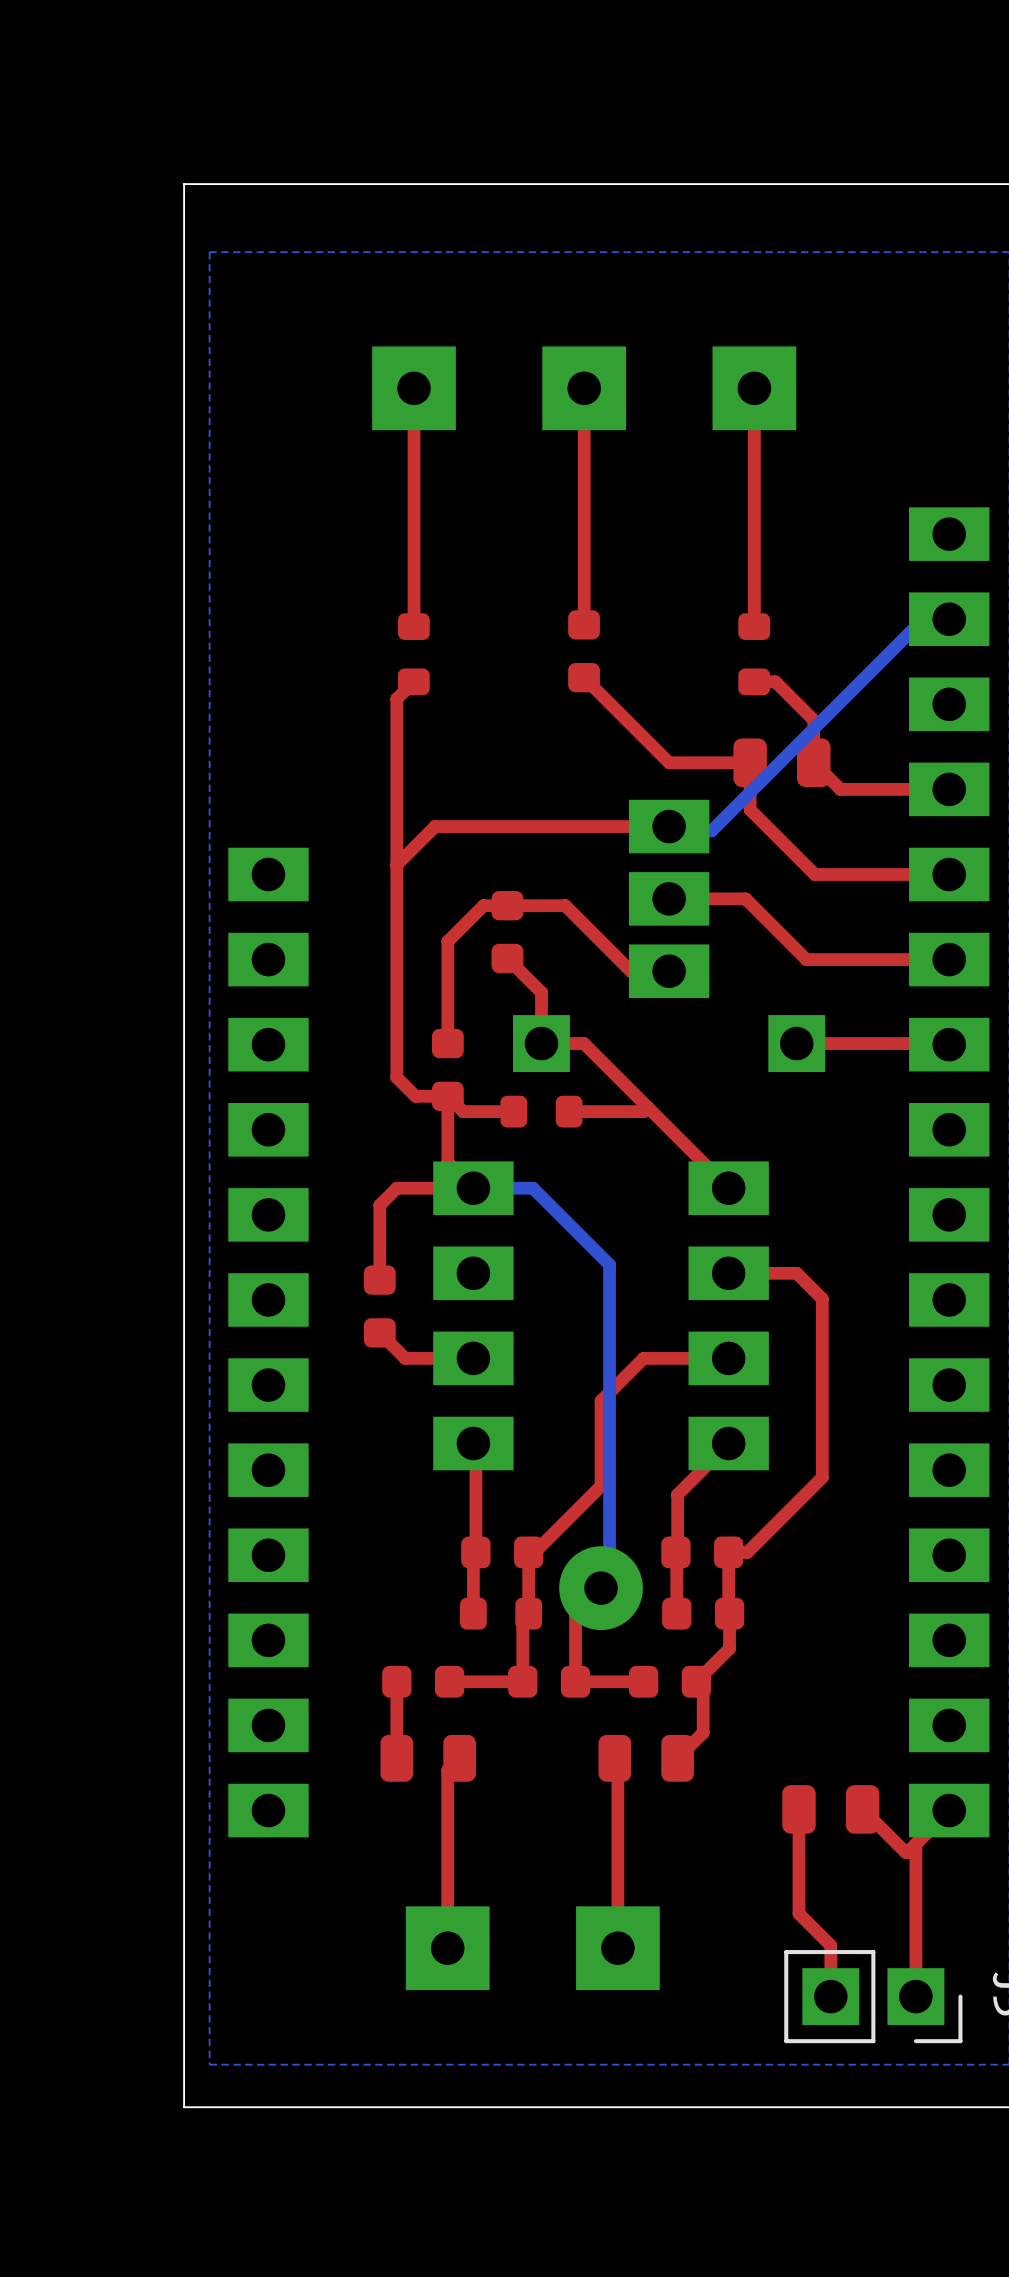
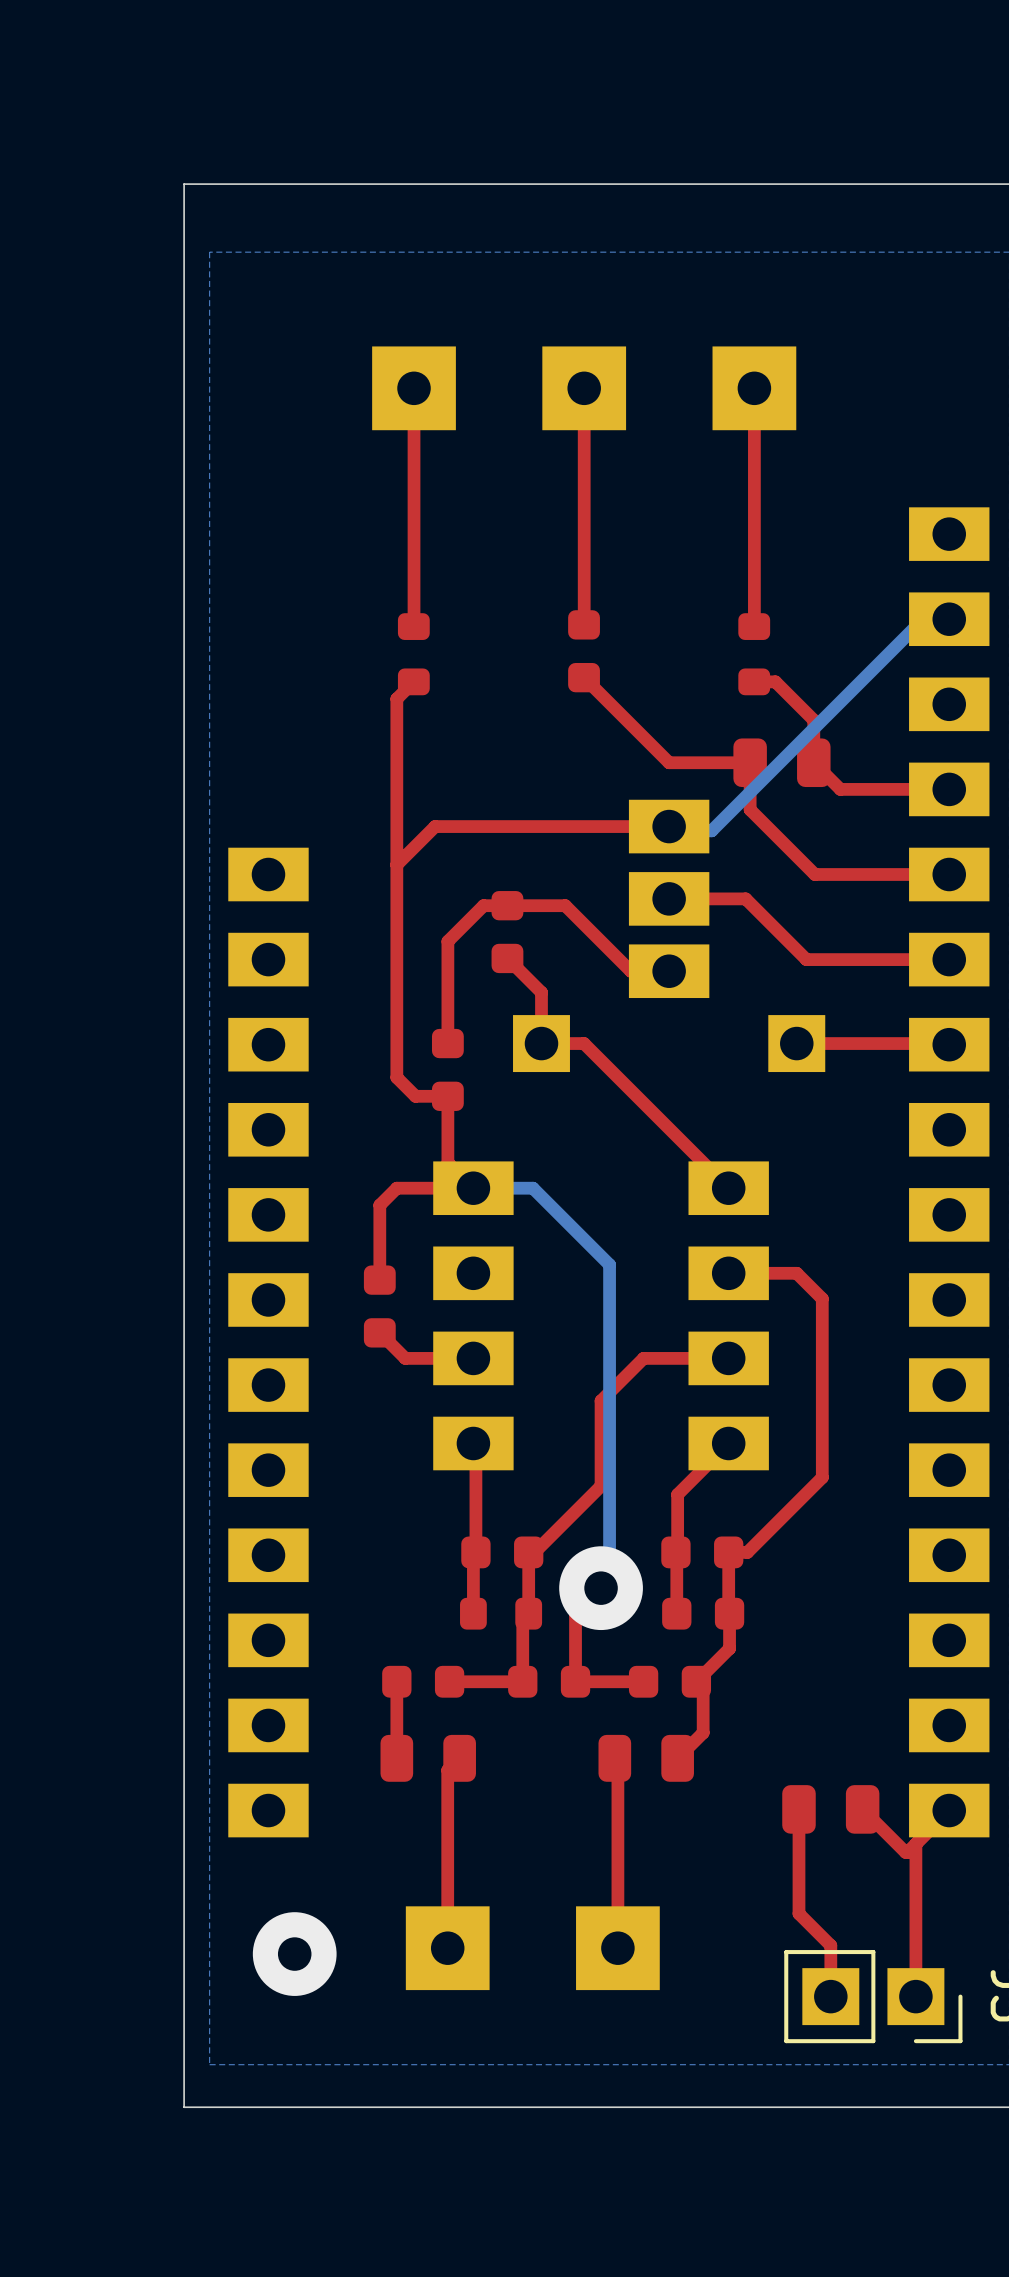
top track: (447, 1096) (463, 1111) (513, 1111) -> none
top track: (647, 1107) (643, 1111) (569, 1111) -> none
part: (541, 1111) -> none
via: none -> (294, 1954)

